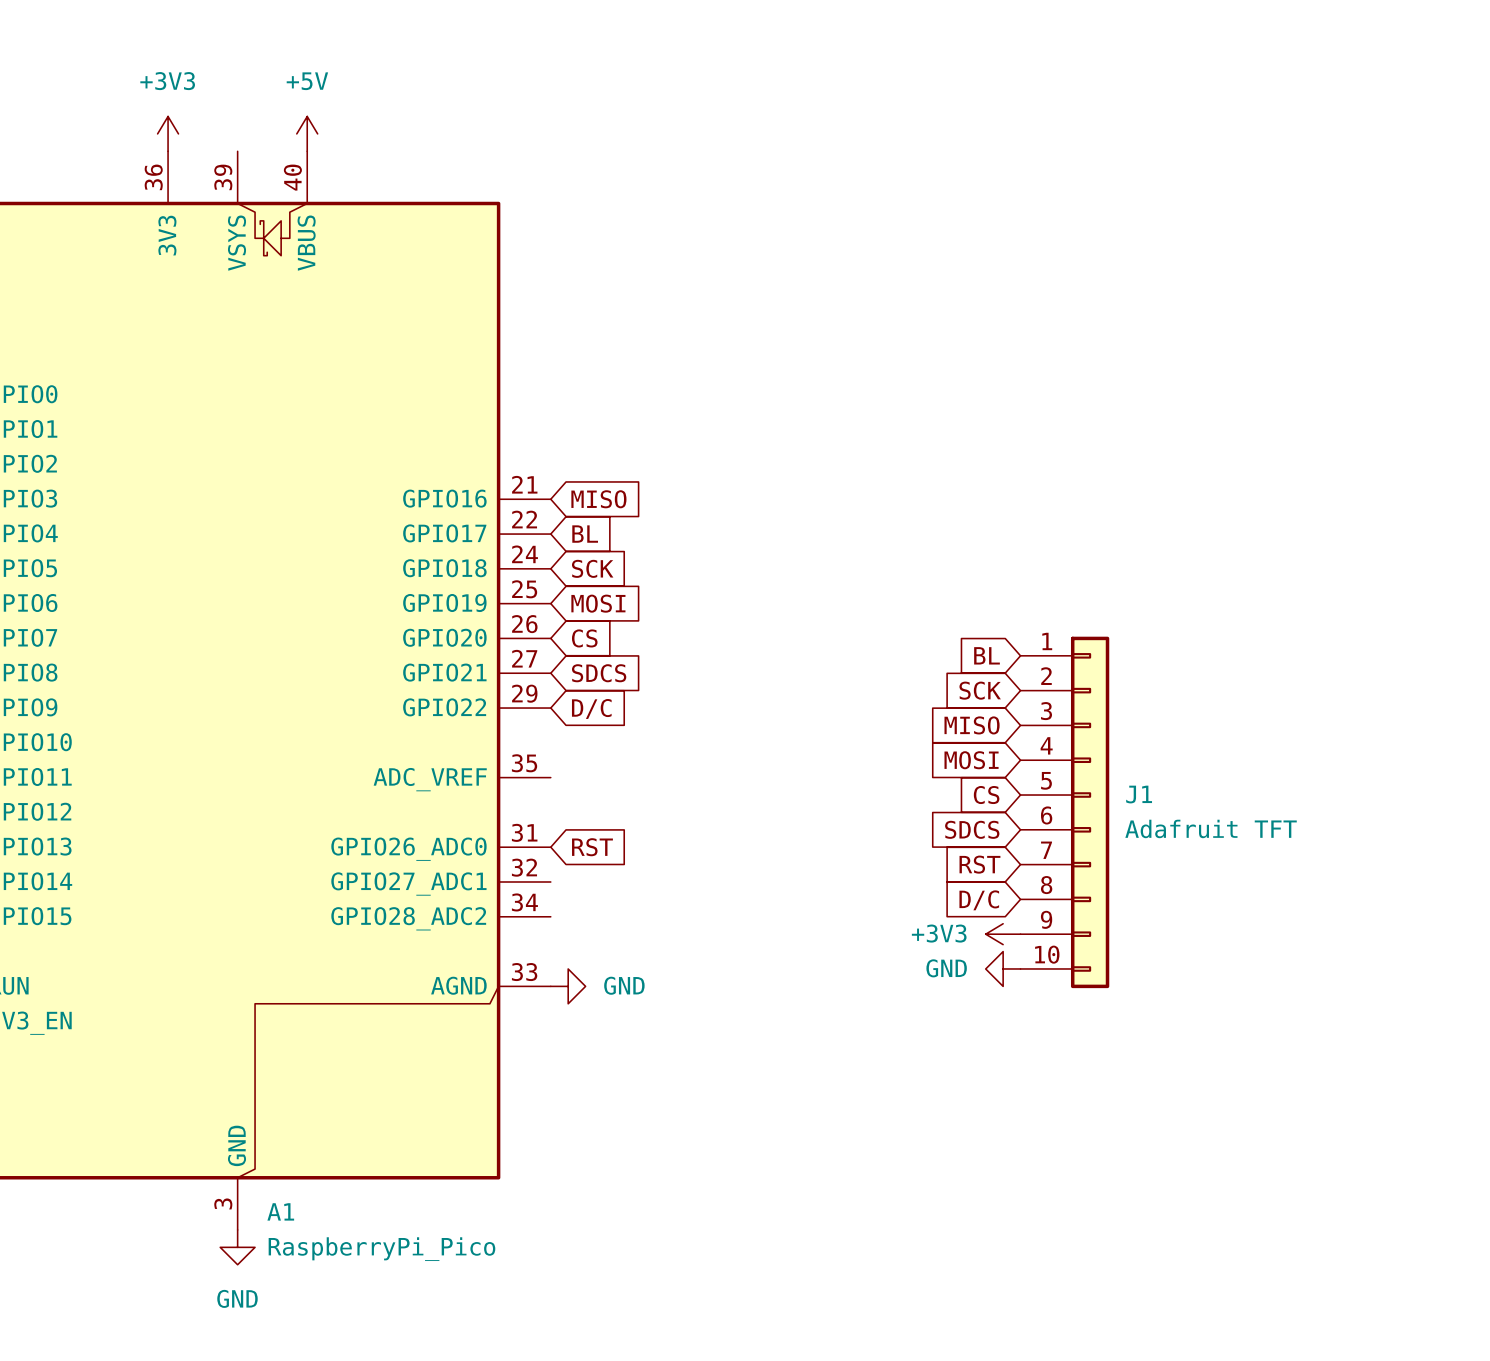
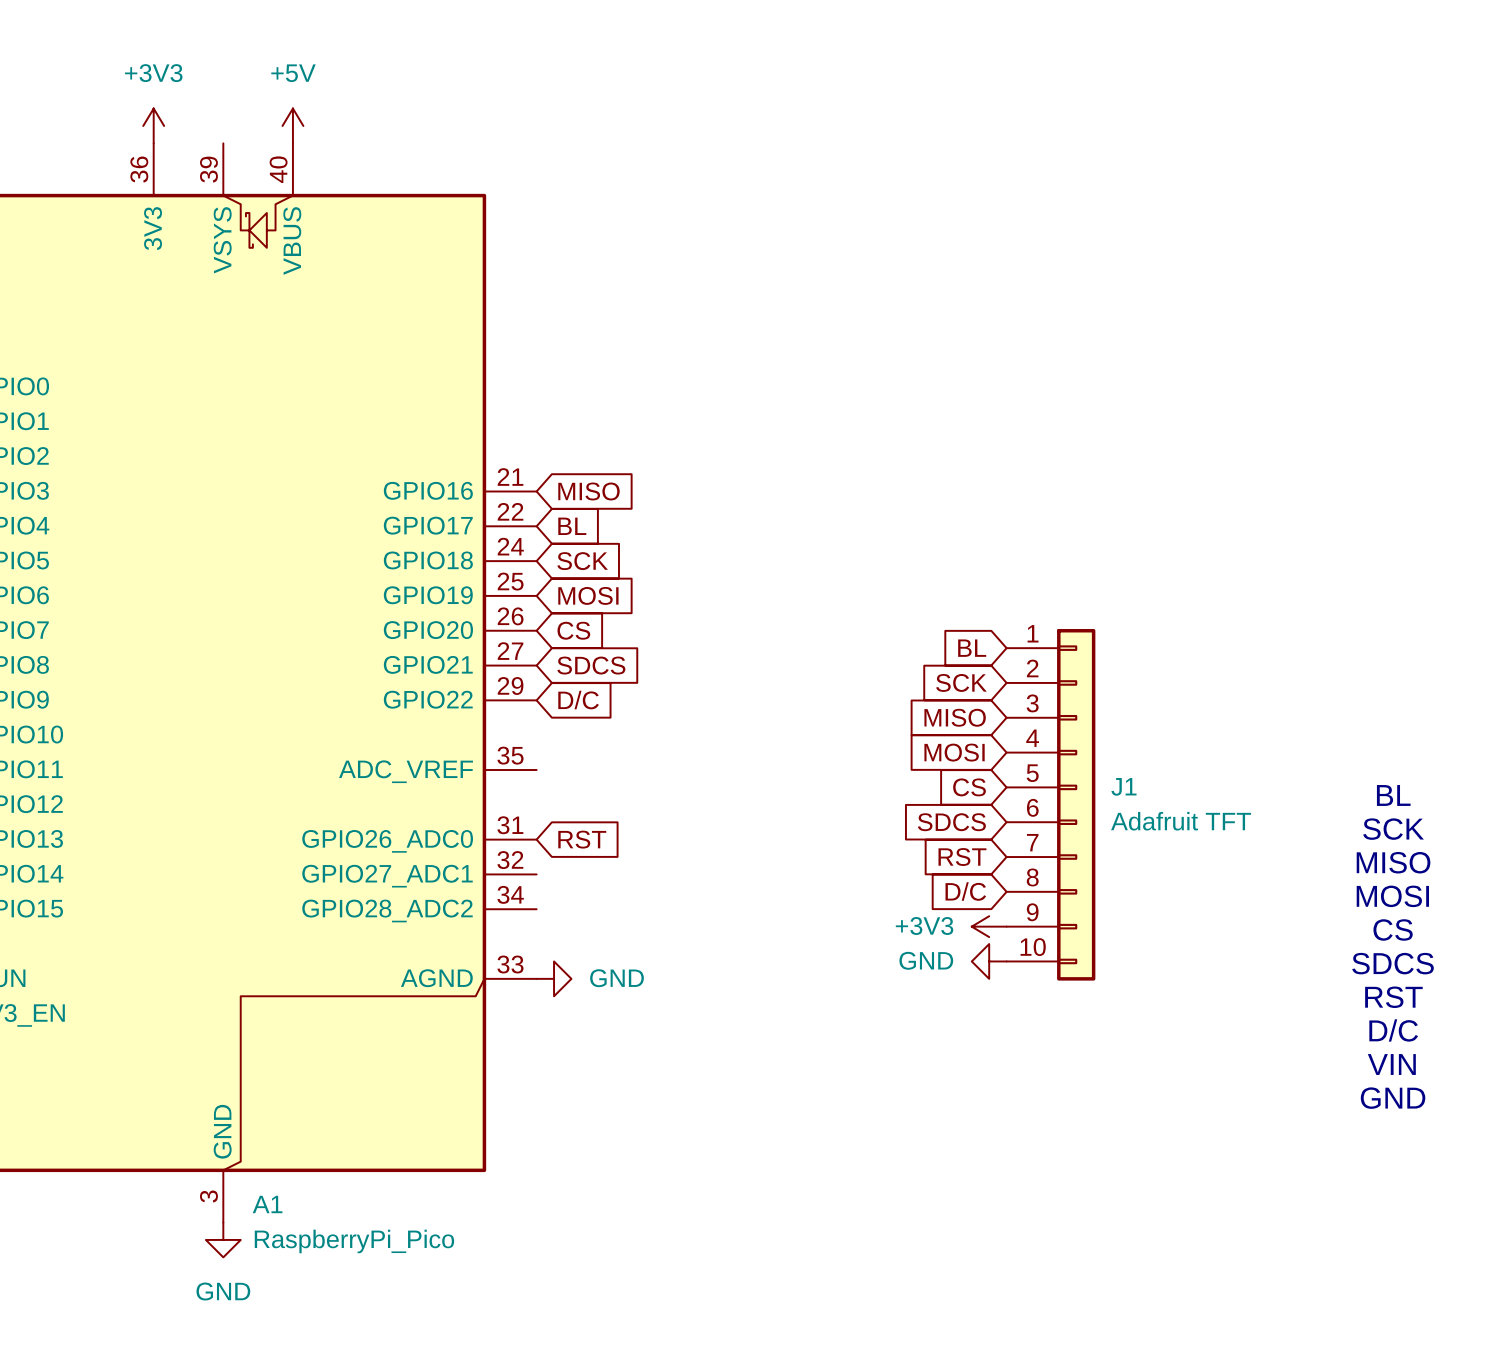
text: none -> BL (1393, 795)
text: none -> SCK (1393, 829)
text: none -> MISO (1393, 862)
text: none -> MOSI (1392, 896)
text: none -> CS (1393, 929)
text: none -> SDCS (1393, 963)
text: none -> RST (1393, 997)
text: none -> D/C (1393, 1030)
text: none -> VIN (1391, 1064)
text: none -> GND (1393, 1098)

